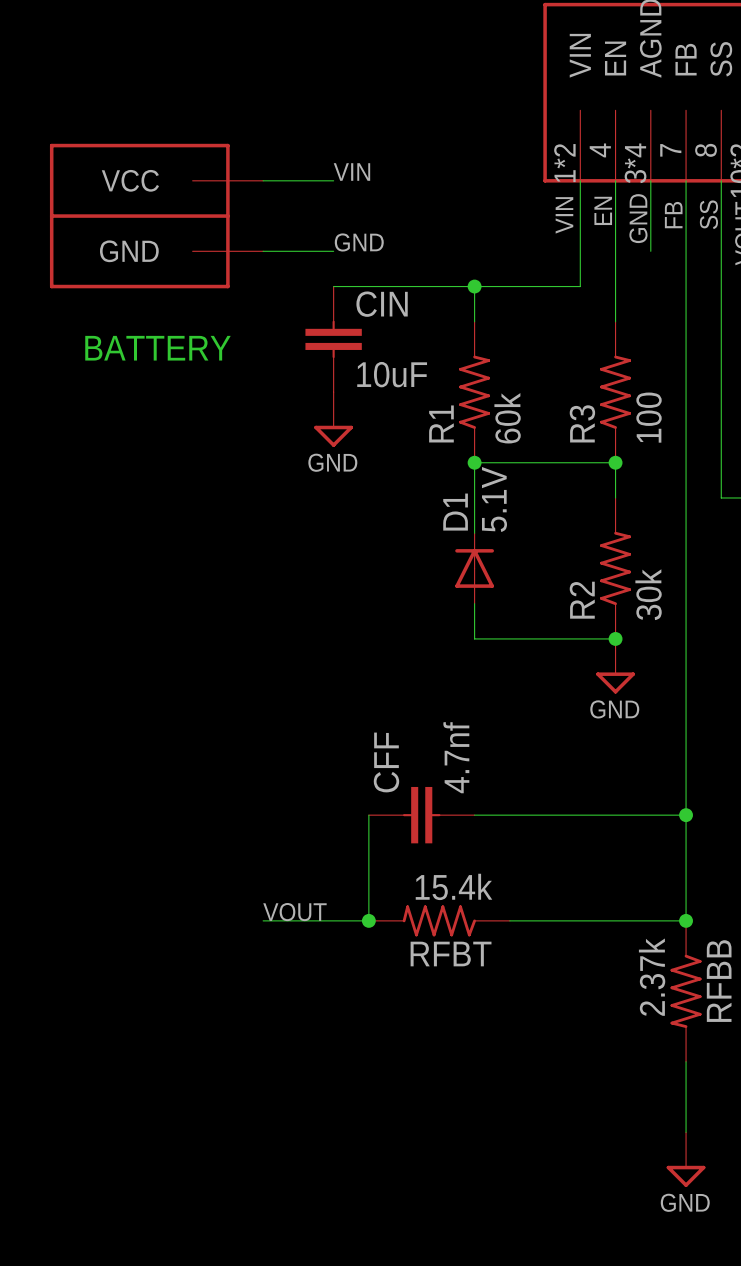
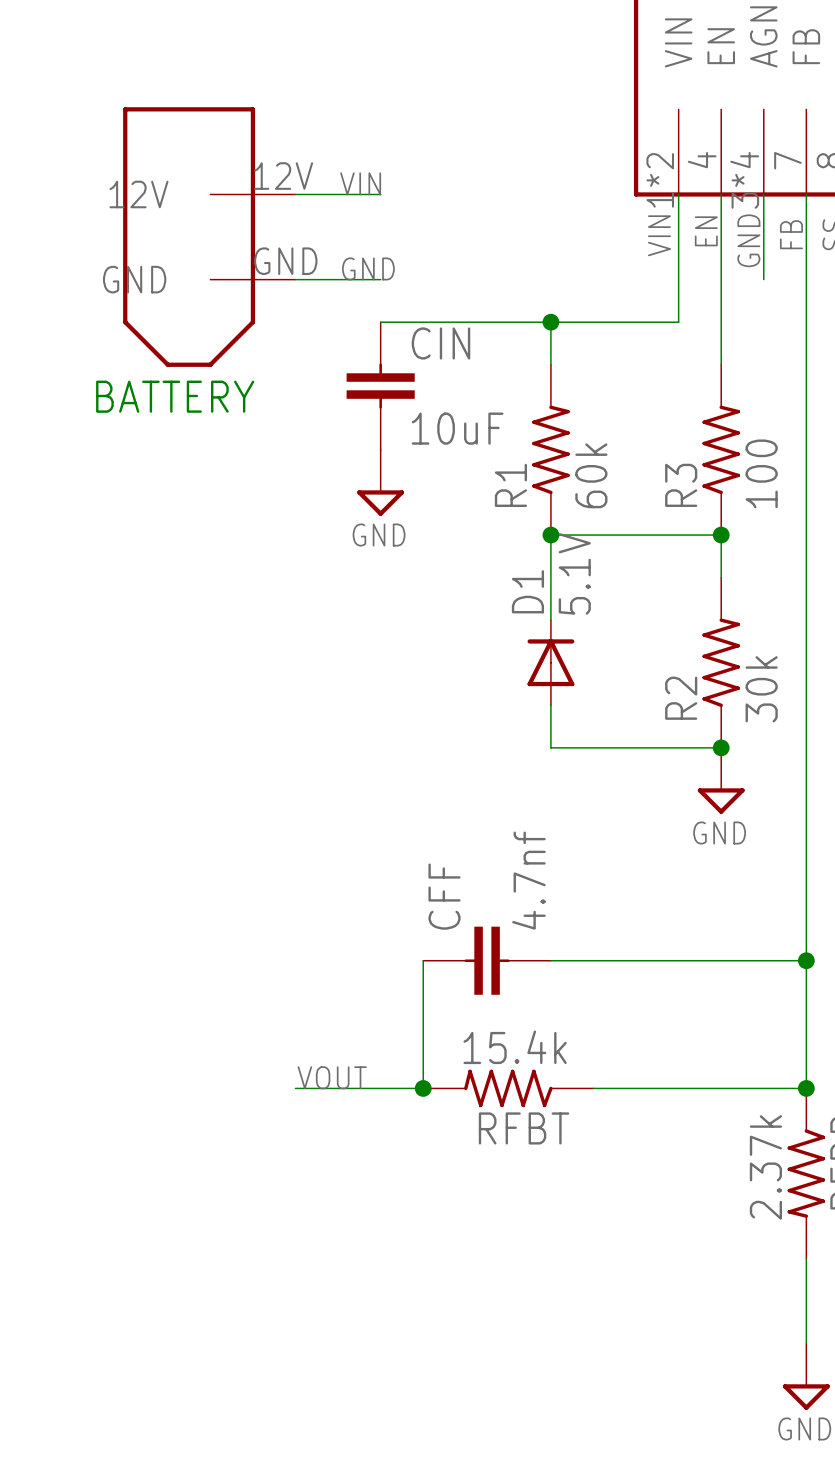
label position: VIN (351, 172) -> VIN (360, 183)
part: (156, 216) -> none
part: none -> (209, 237)
label position: GND (359, 242) -> GND (368, 268)

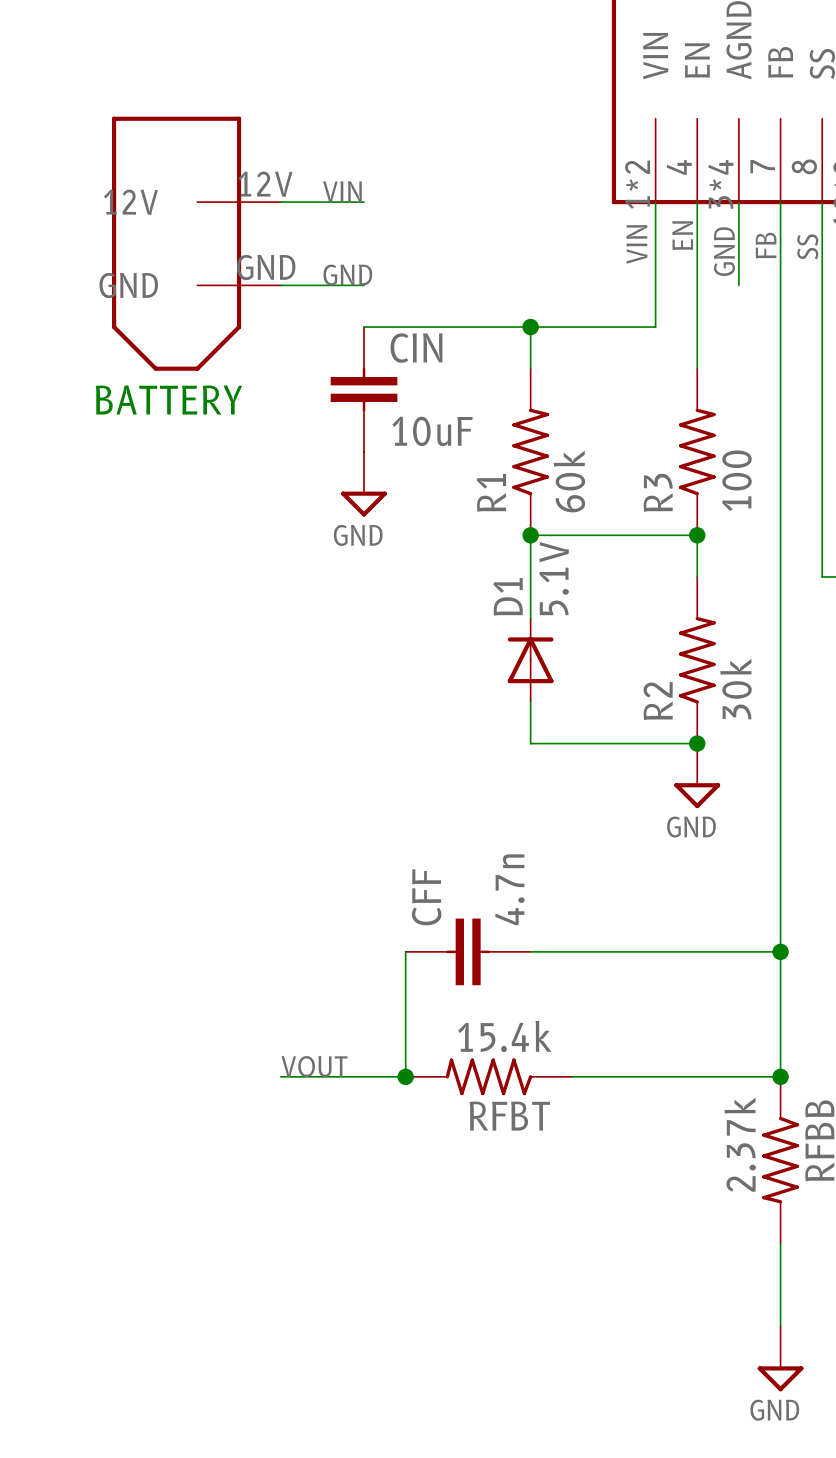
CFF value: 4.7nf (528, 880) -> 4.7n (509, 889)

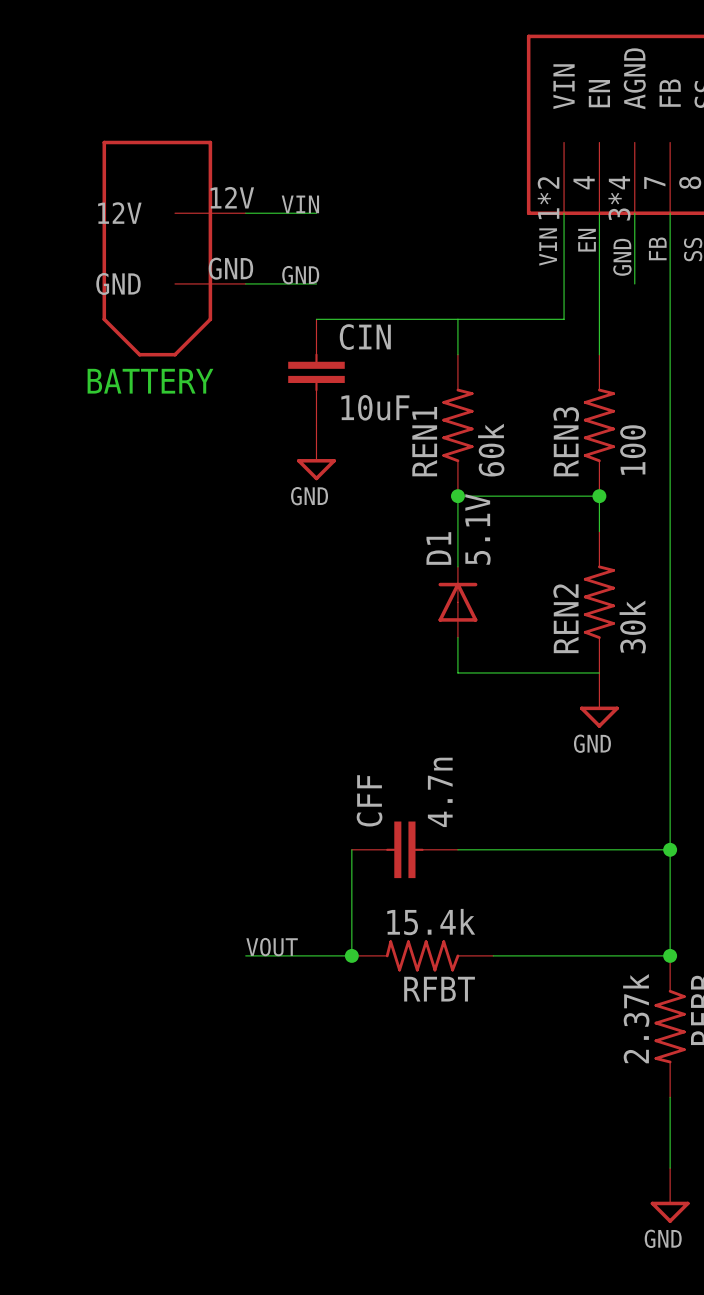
junction: (530, 327) -> none
R1 name: R1 (491, 492) -> REN1 (424, 441)
R3 name: R3 (658, 492) -> REN3 (566, 441)
R2 name: R2 (658, 701) -> REN2 (565, 618)
junction: (697, 743) -> none

